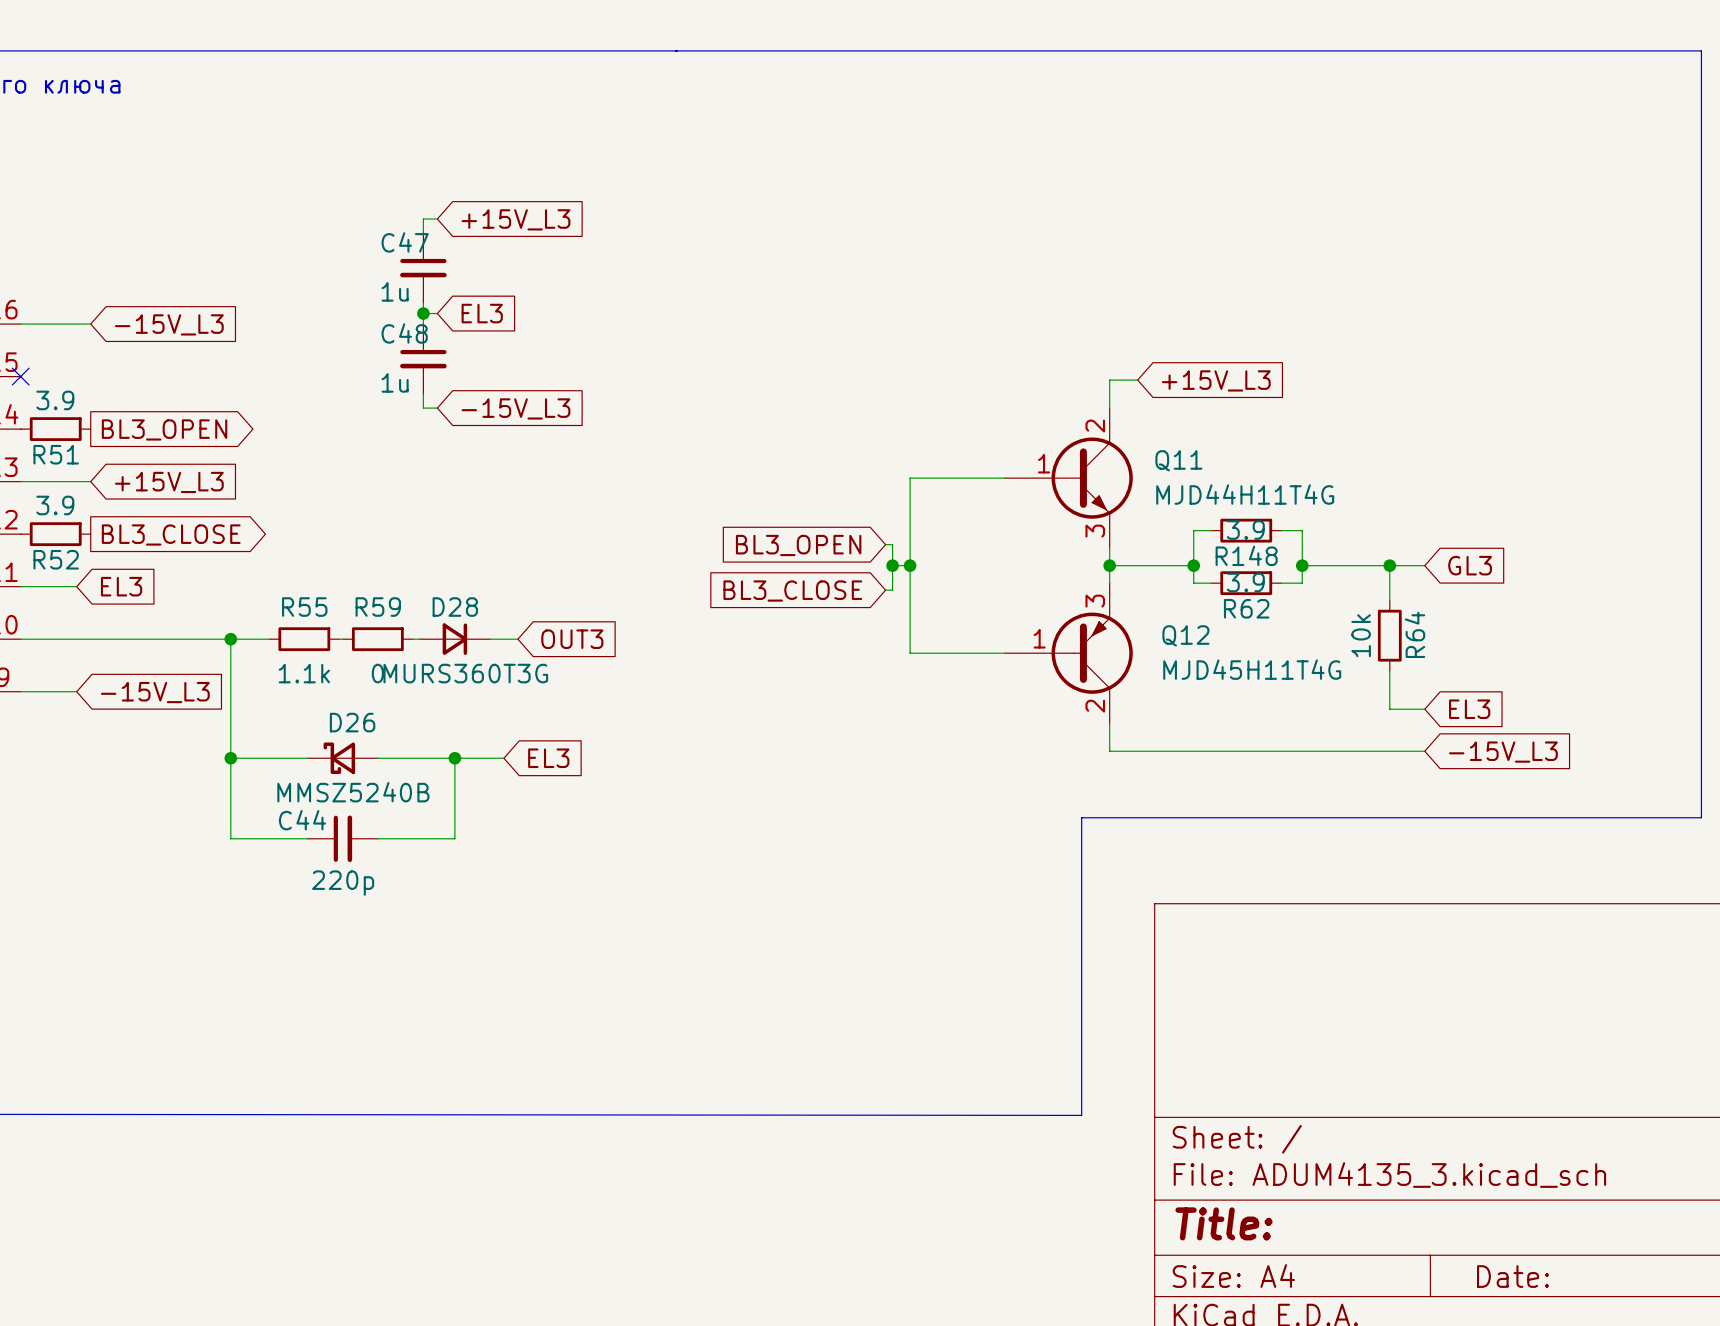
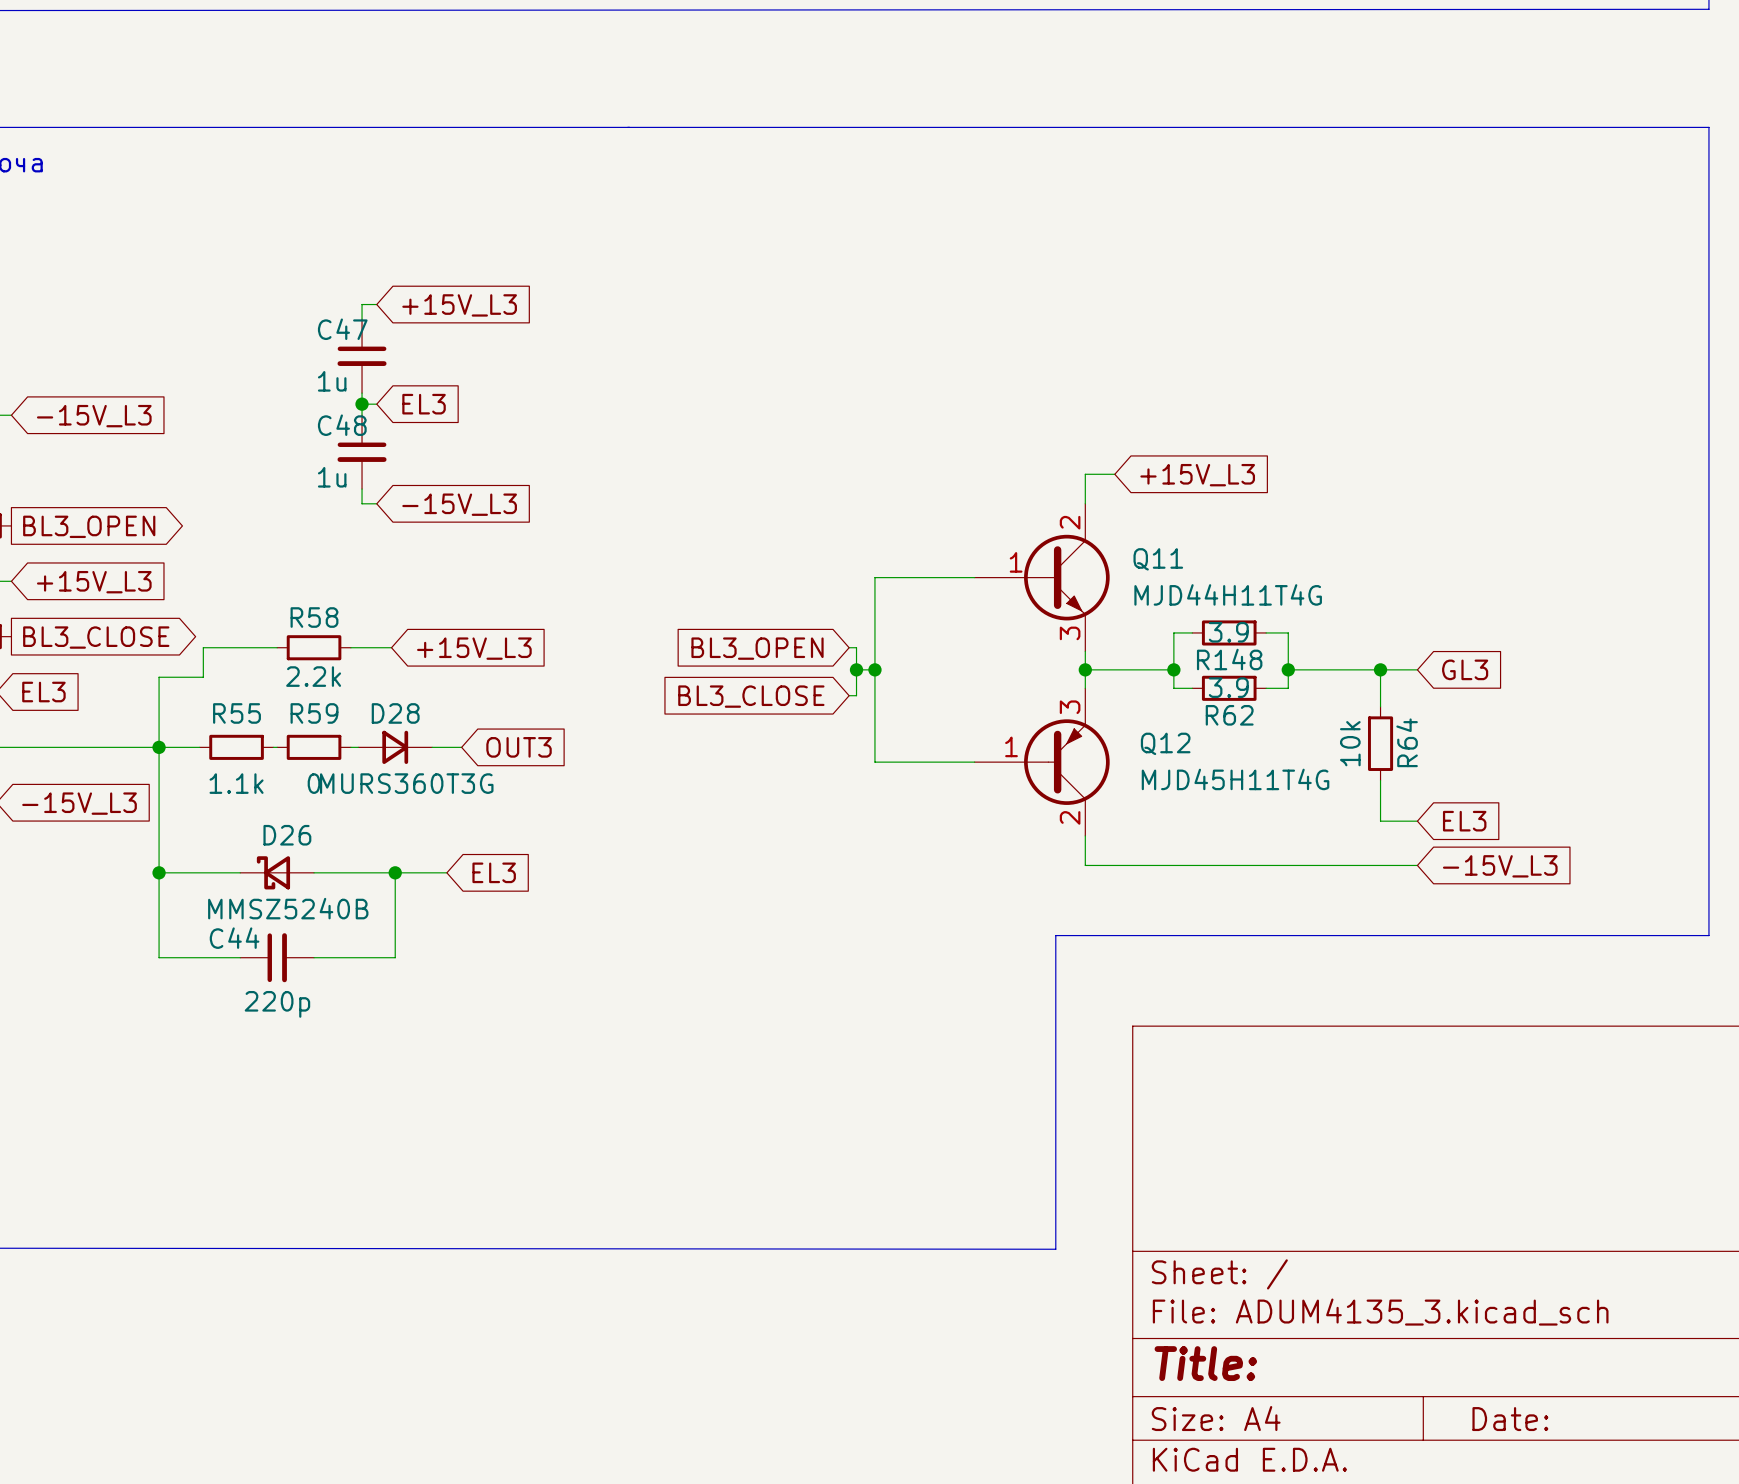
wire: none -> (277, 647) (203, 647) (203, 677) (159, 677) (159, 747)
R58: none -> 2.2k (314, 647)
wire: none -> (350, 647) (391, 647)
global label: none -> +15V_L3 (474, 648)

